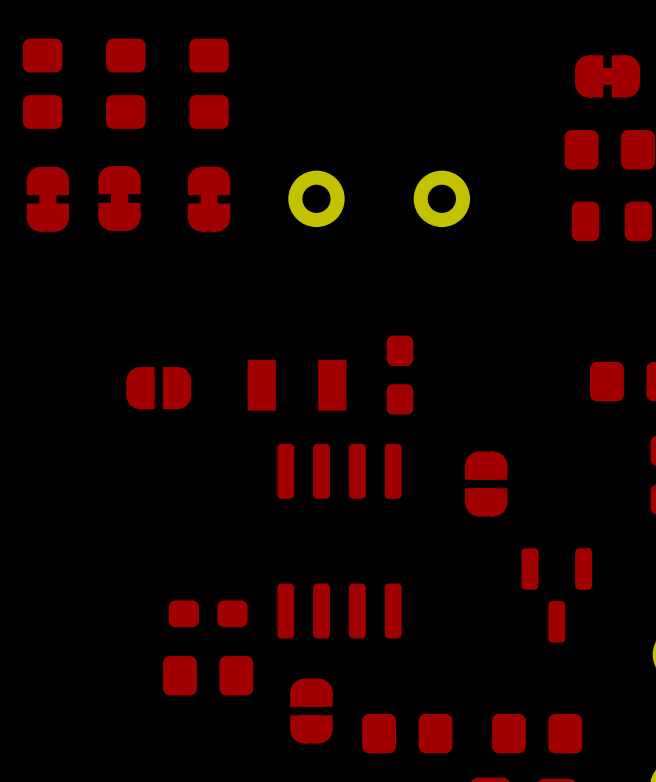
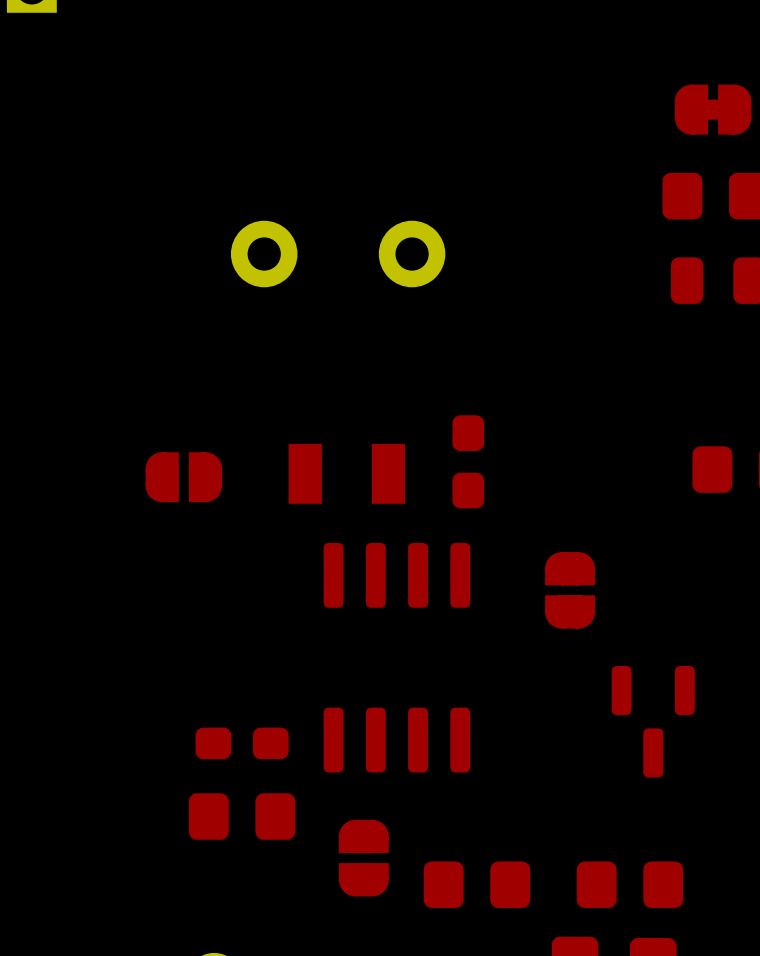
part: (42, 83) -> none
part: (125, 83) -> none
part: (209, 83) -> none
part footprint: [187, 166, 231, 232] -> [230, 220, 298, 288]
part: (119, 198) -> none
part position: (316, 198) -> (412, 254)
part: (441, 198) -> none
part: (47, 199) -> none

